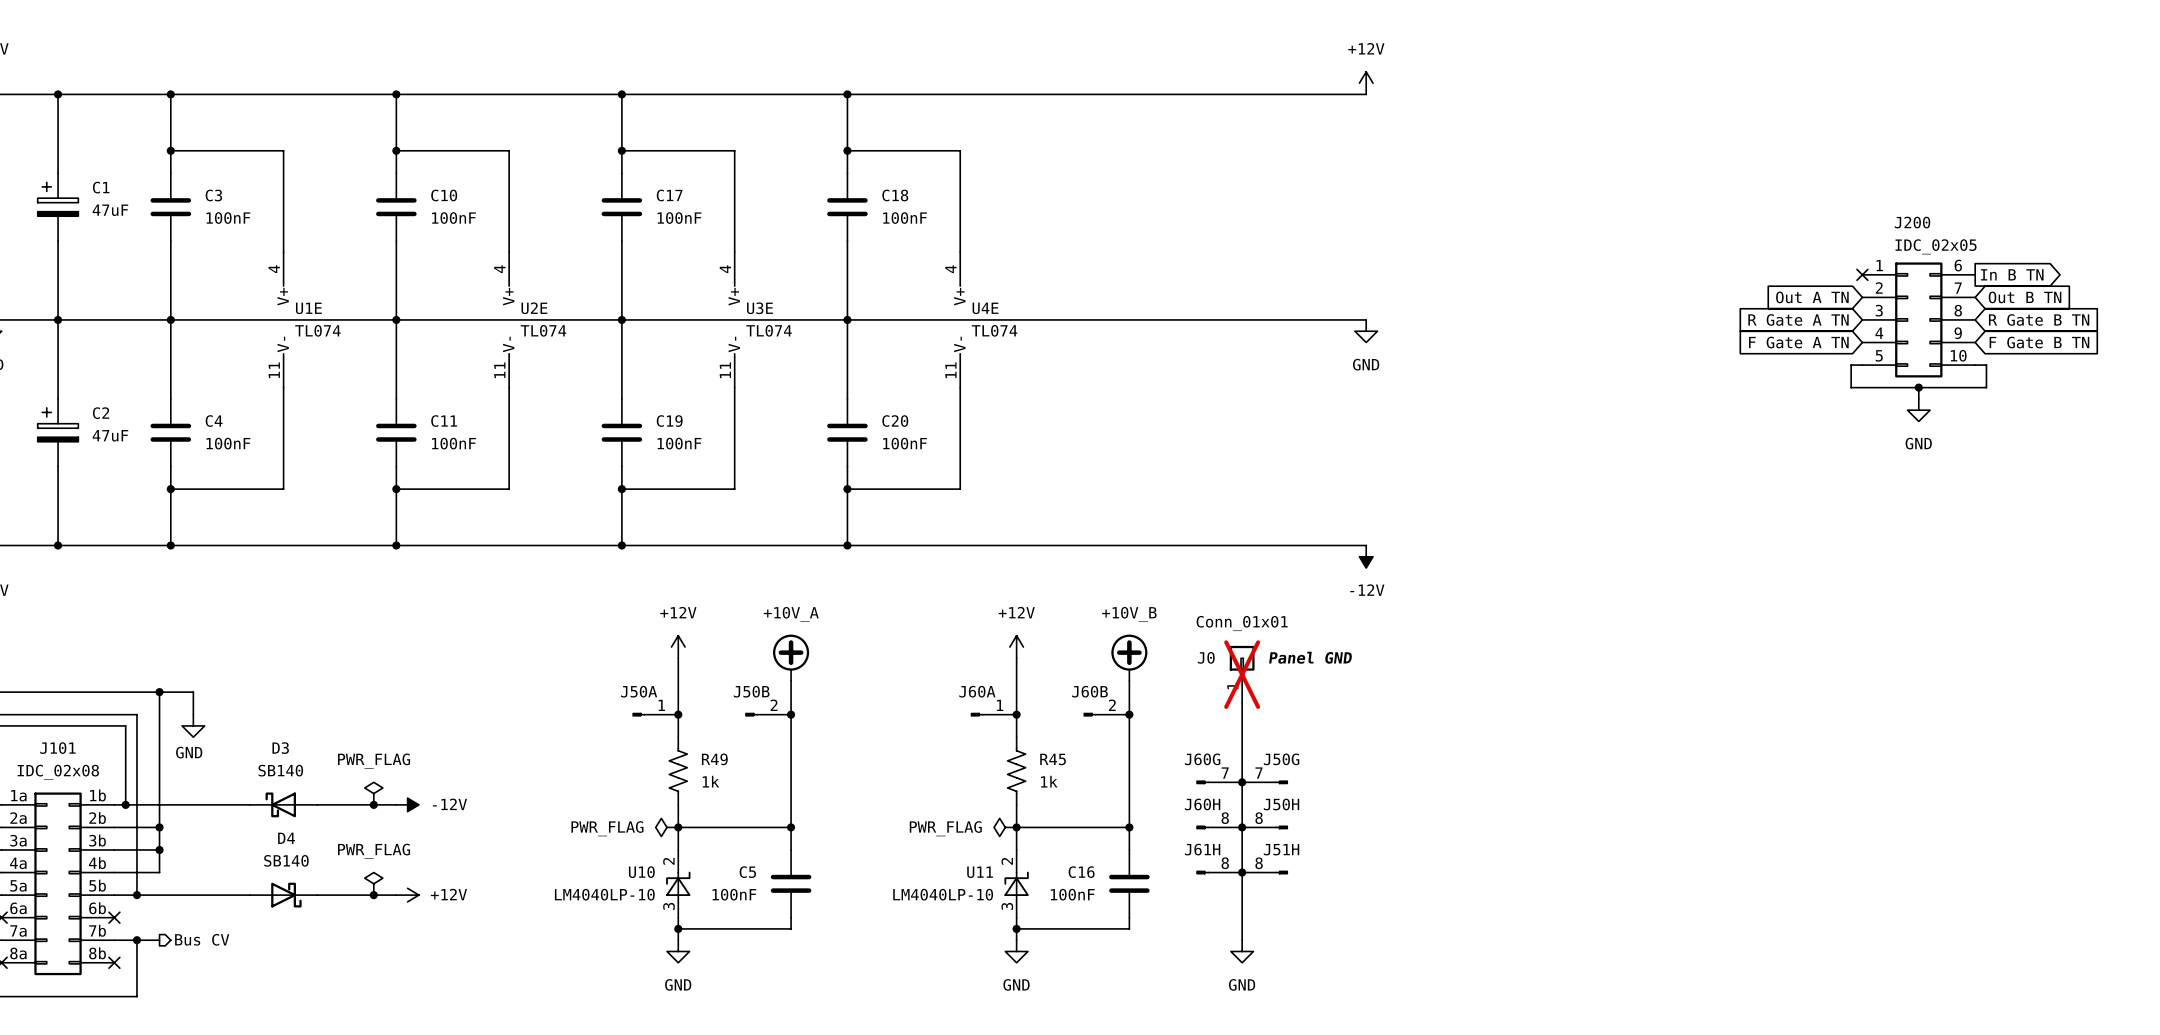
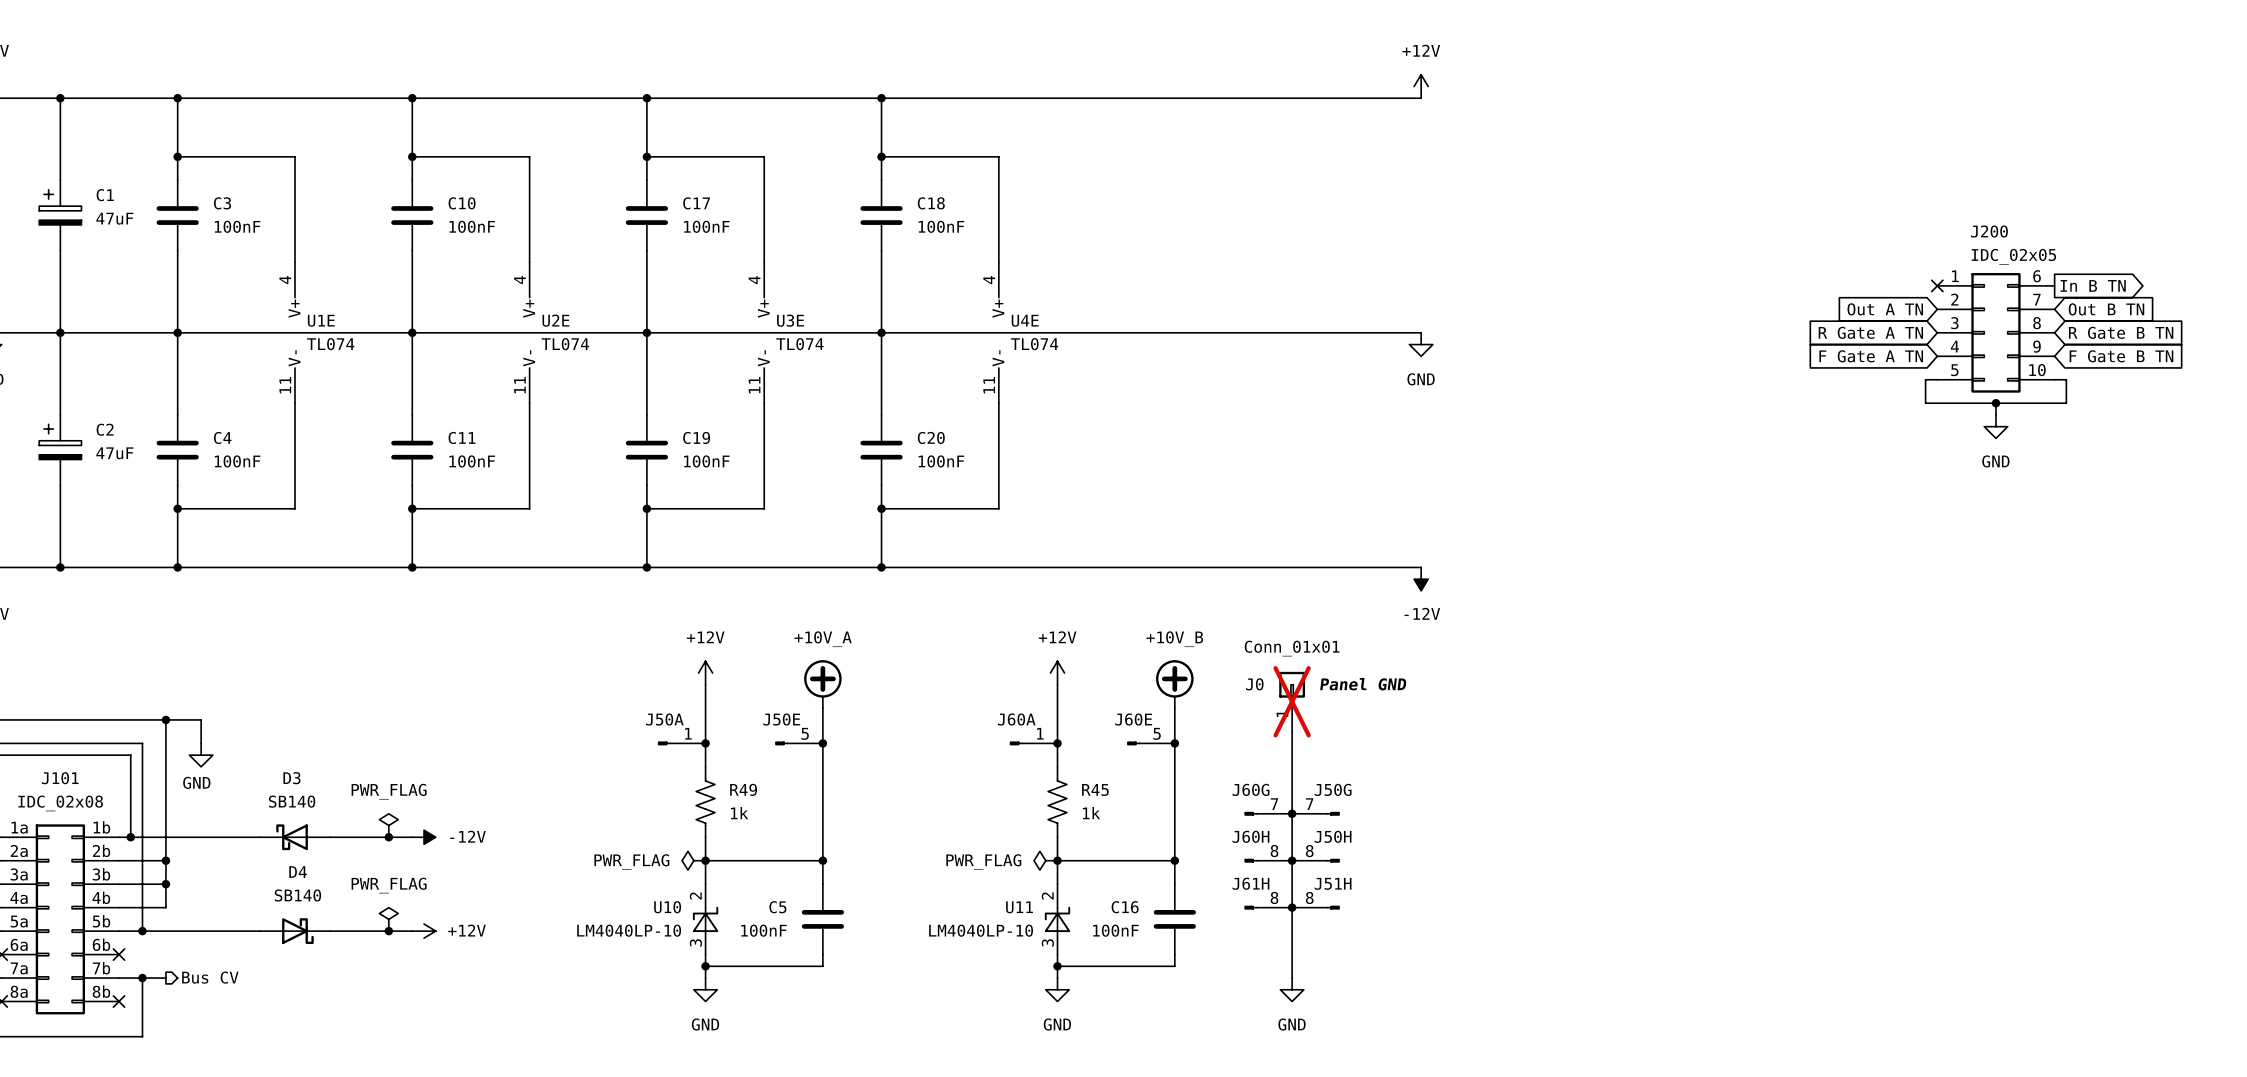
J50B name: J50B (751, 691) -> J50E (781, 719)
J60B name: J60B (1089, 691) -> J60E (1133, 719)
J50B pin number: 2 (774, 705) -> 5 (805, 733)
J60B pin number: 2 (1112, 705) -> 5 (1157, 733)

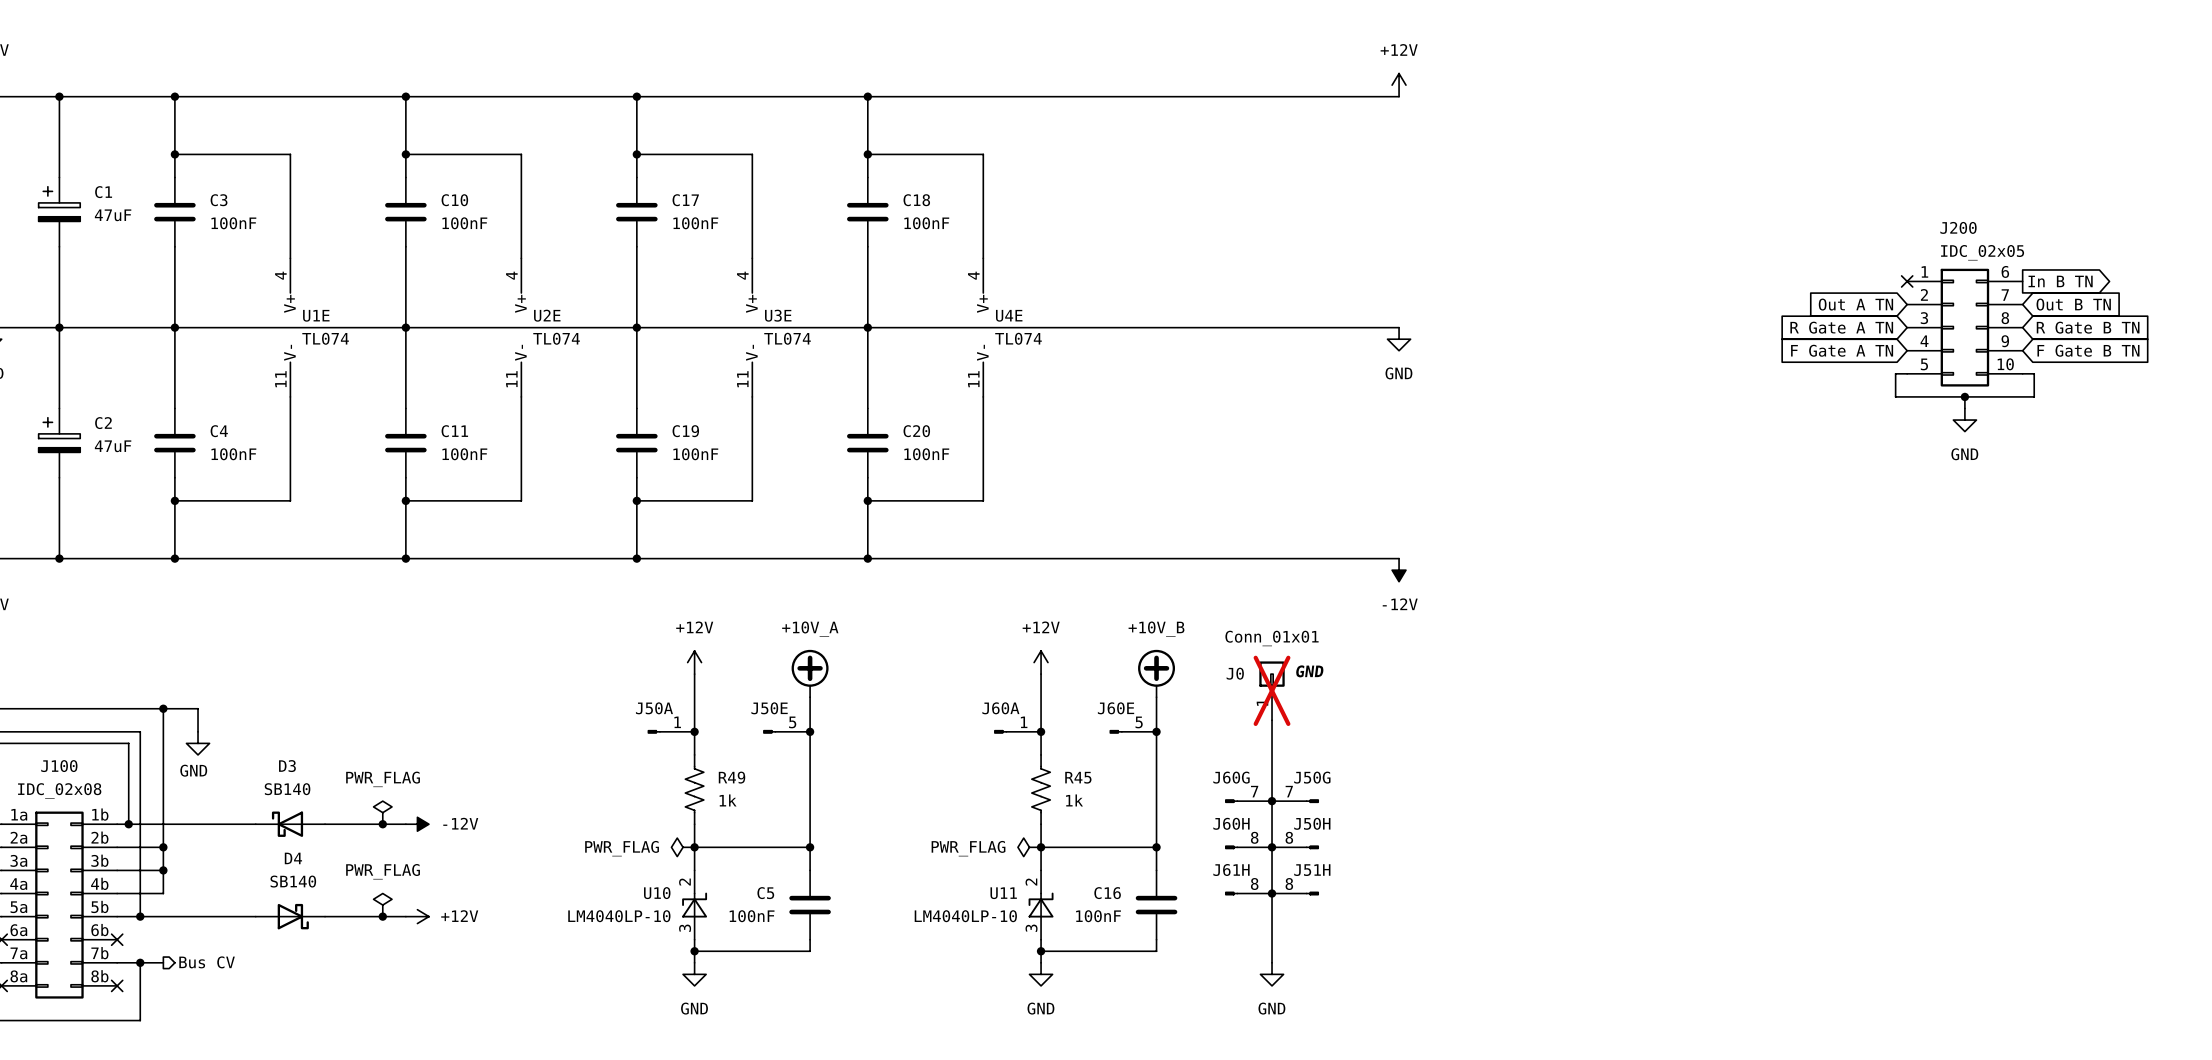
J0 text: Panel GND (1363, 684) -> GND (1309, 671)
J101 name: J101 (60, 778) -> J100 (59, 766)

